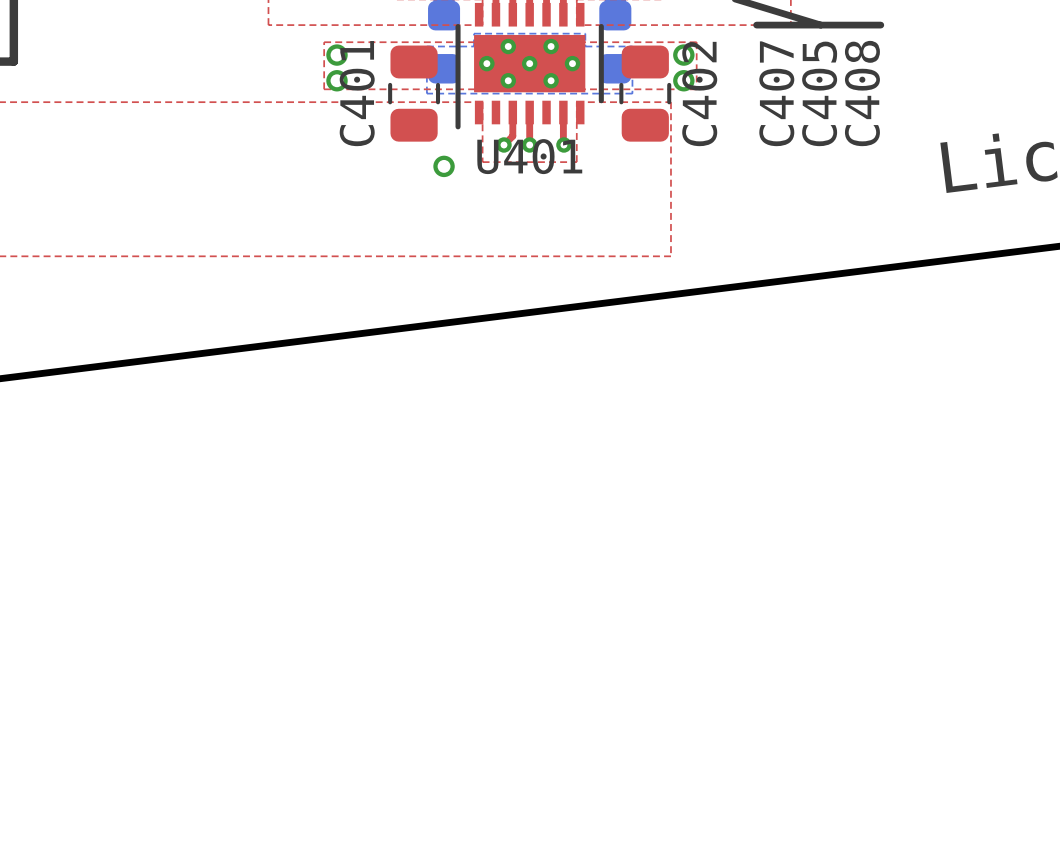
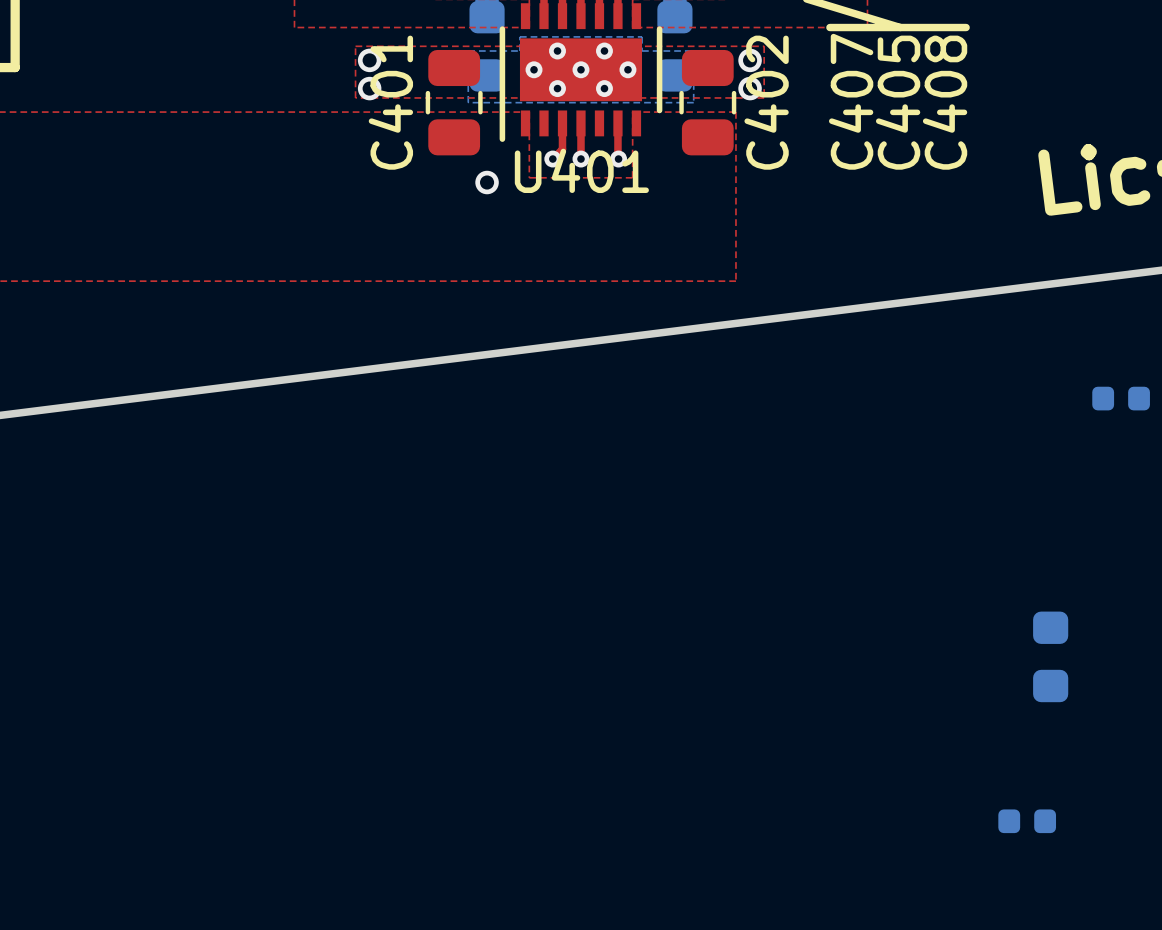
part: none -> (1121, 398)
part: none -> (1050, 656)
part: none -> (1027, 821)

